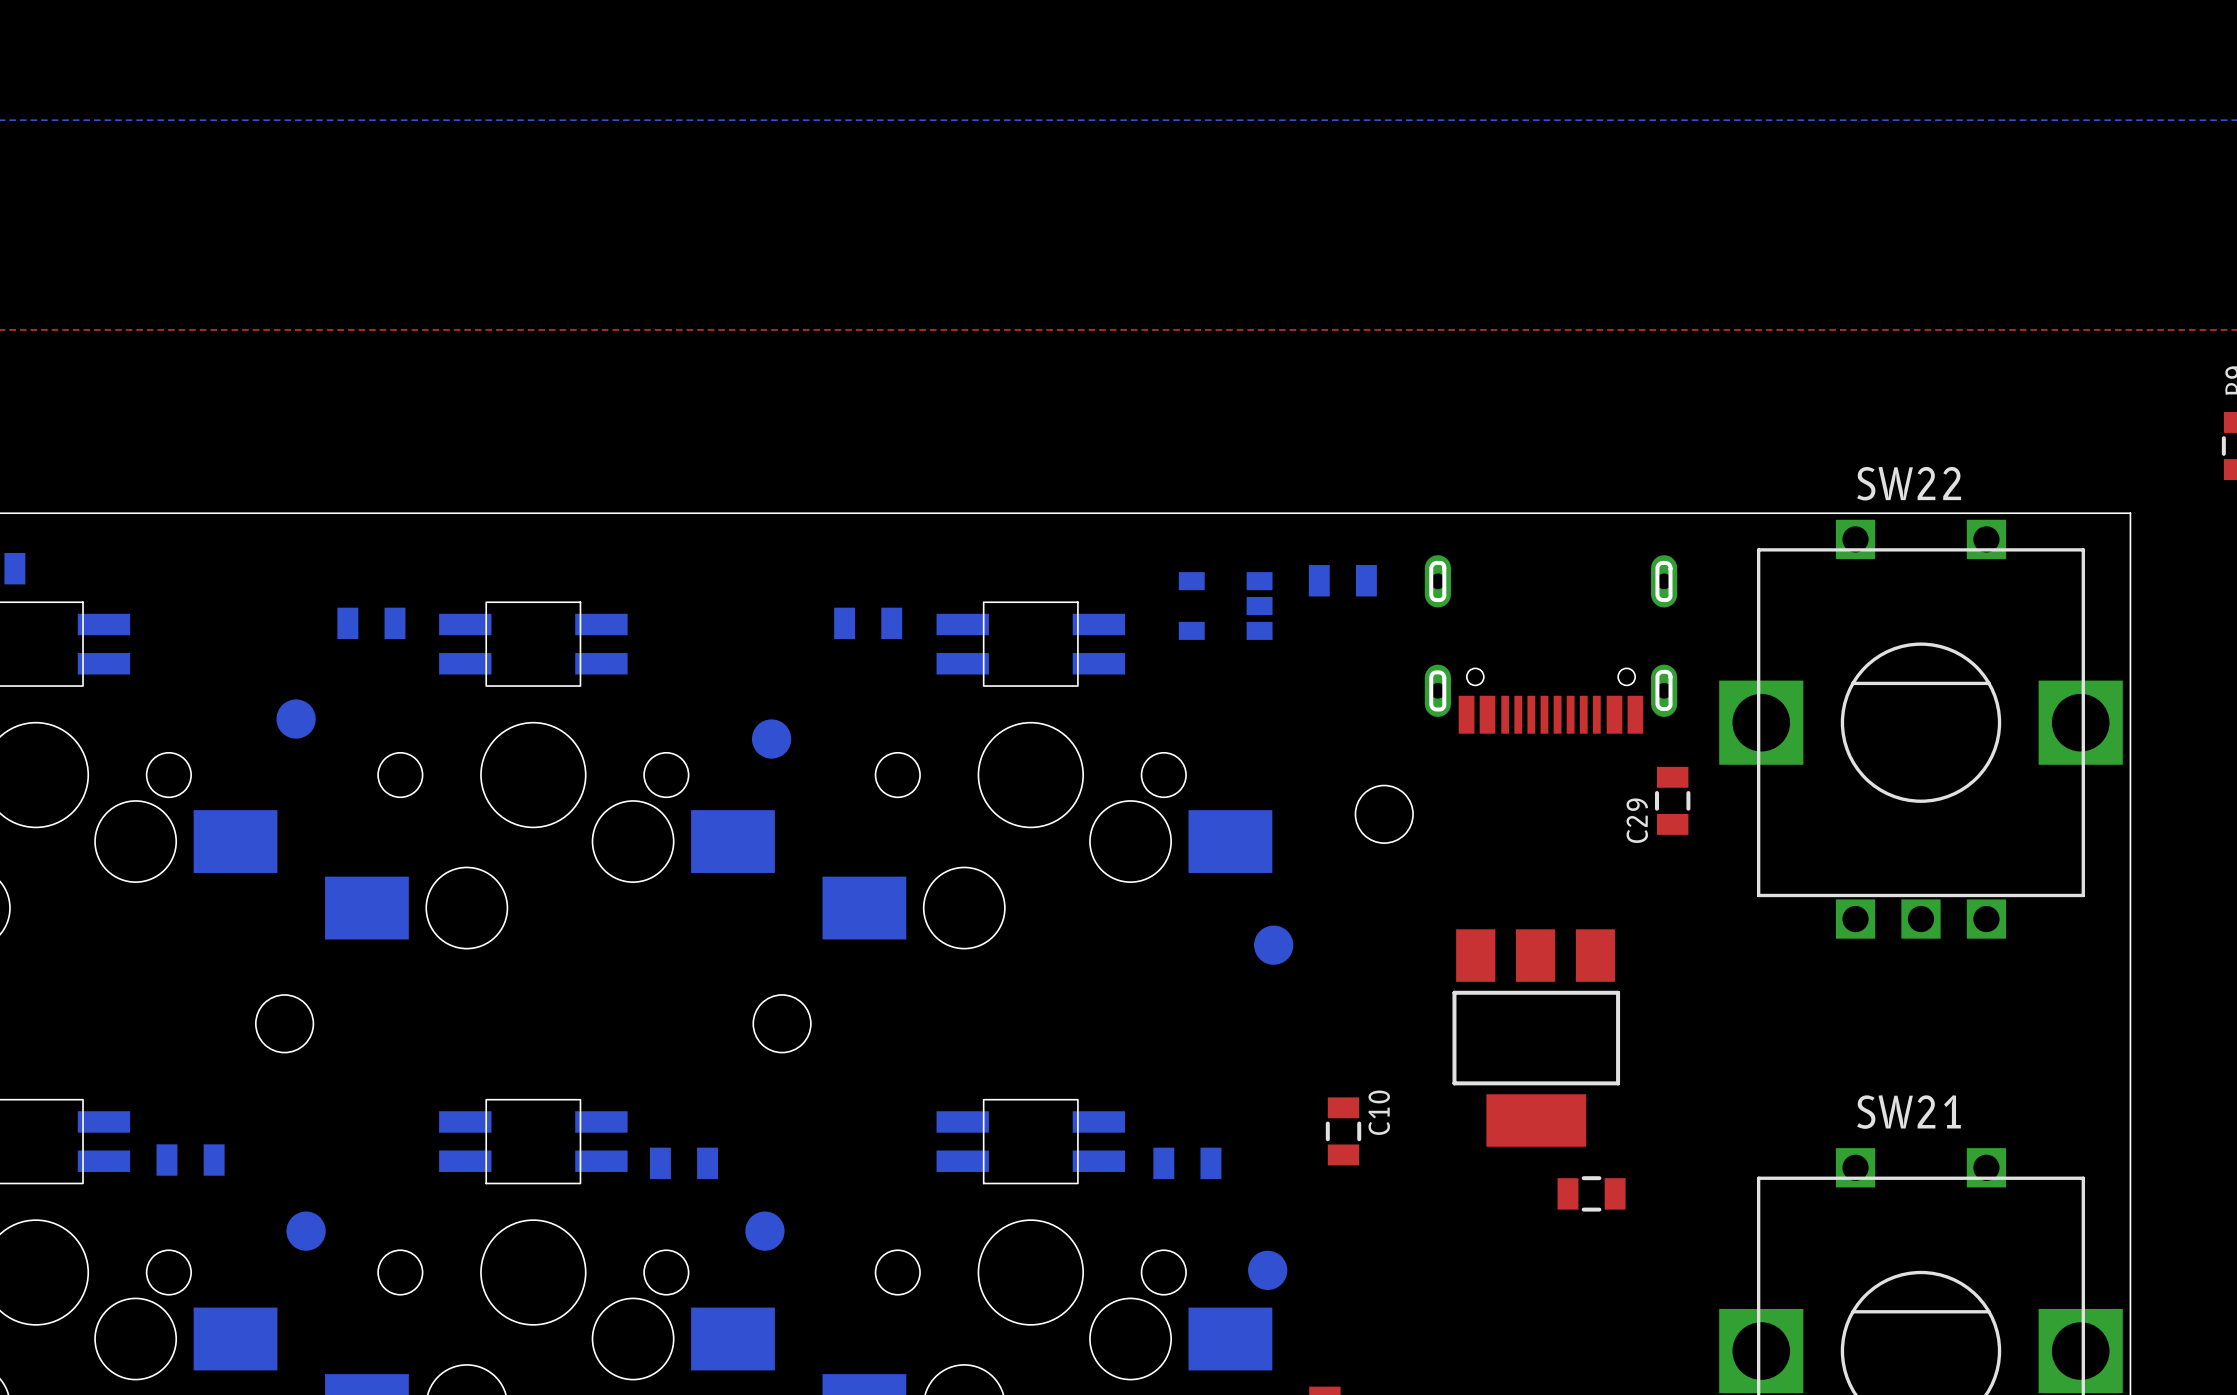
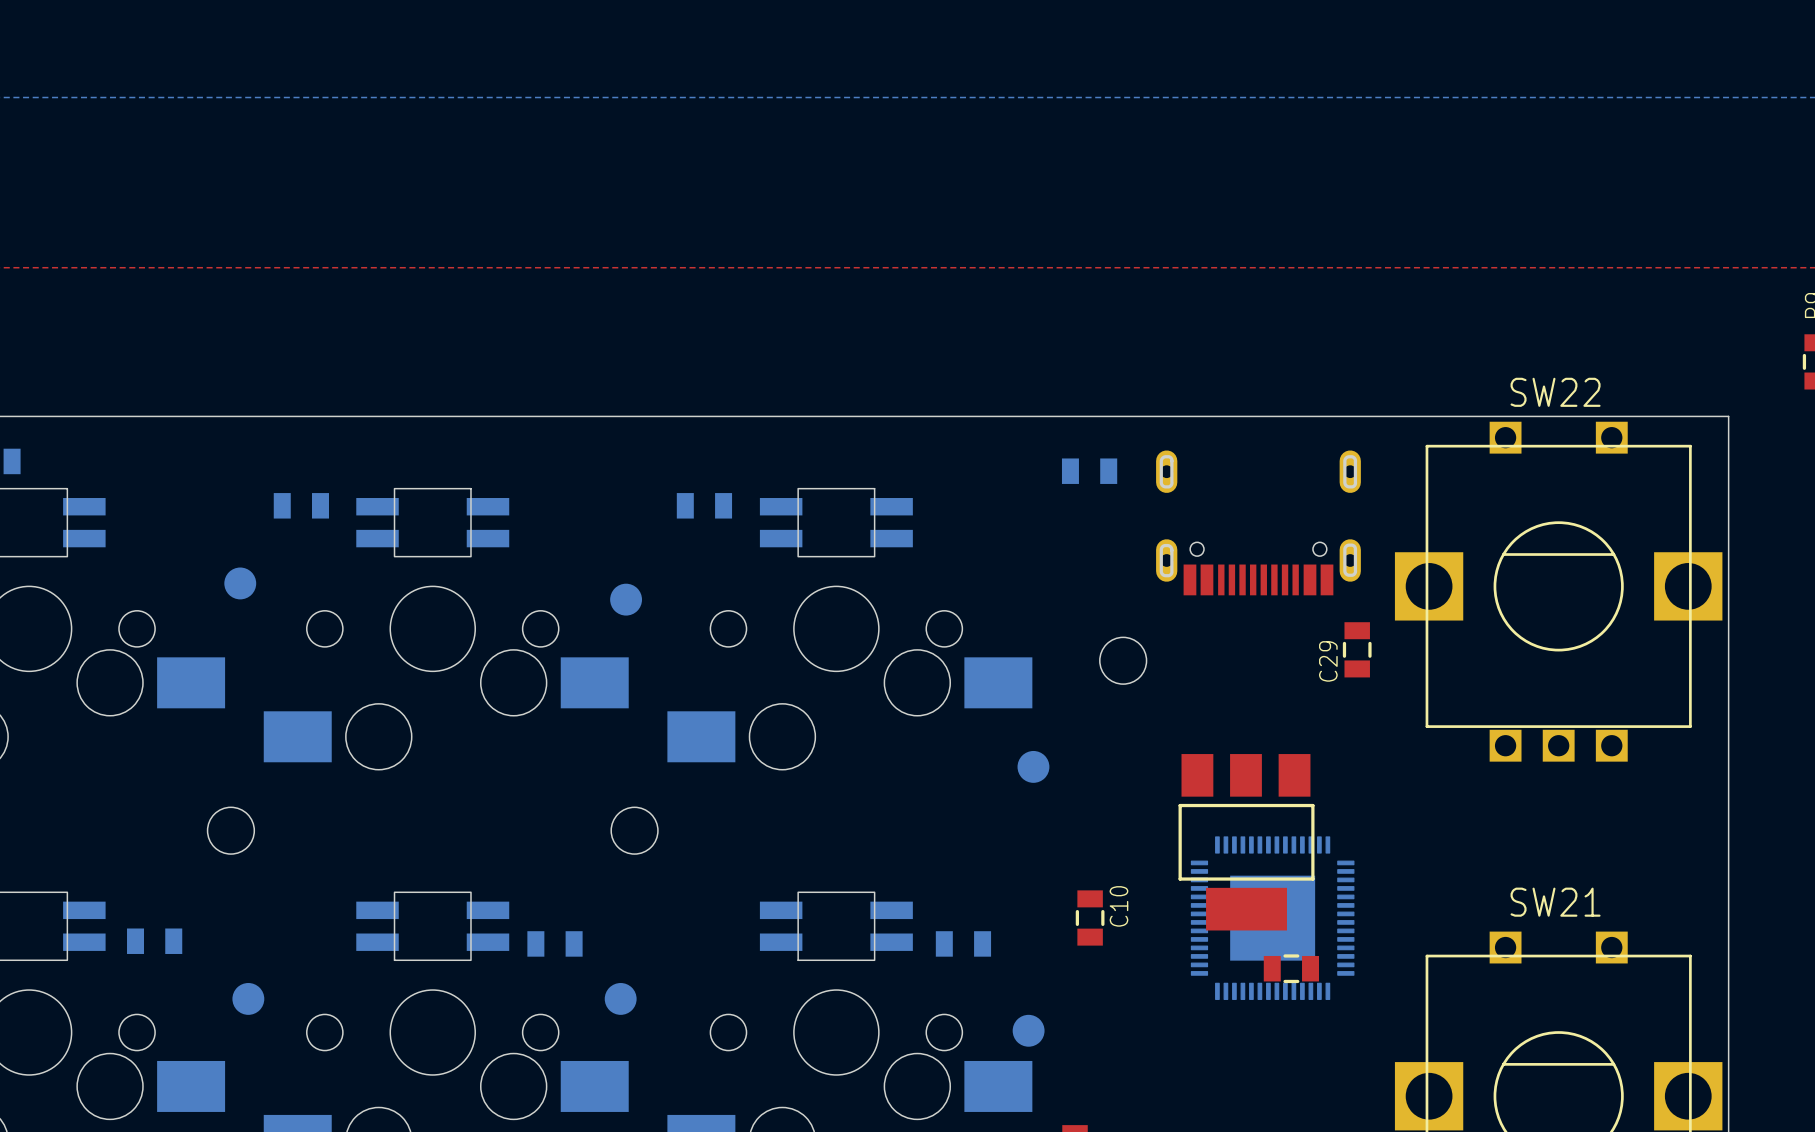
part: (1225, 606) -> none
part: none -> (1272, 918)

